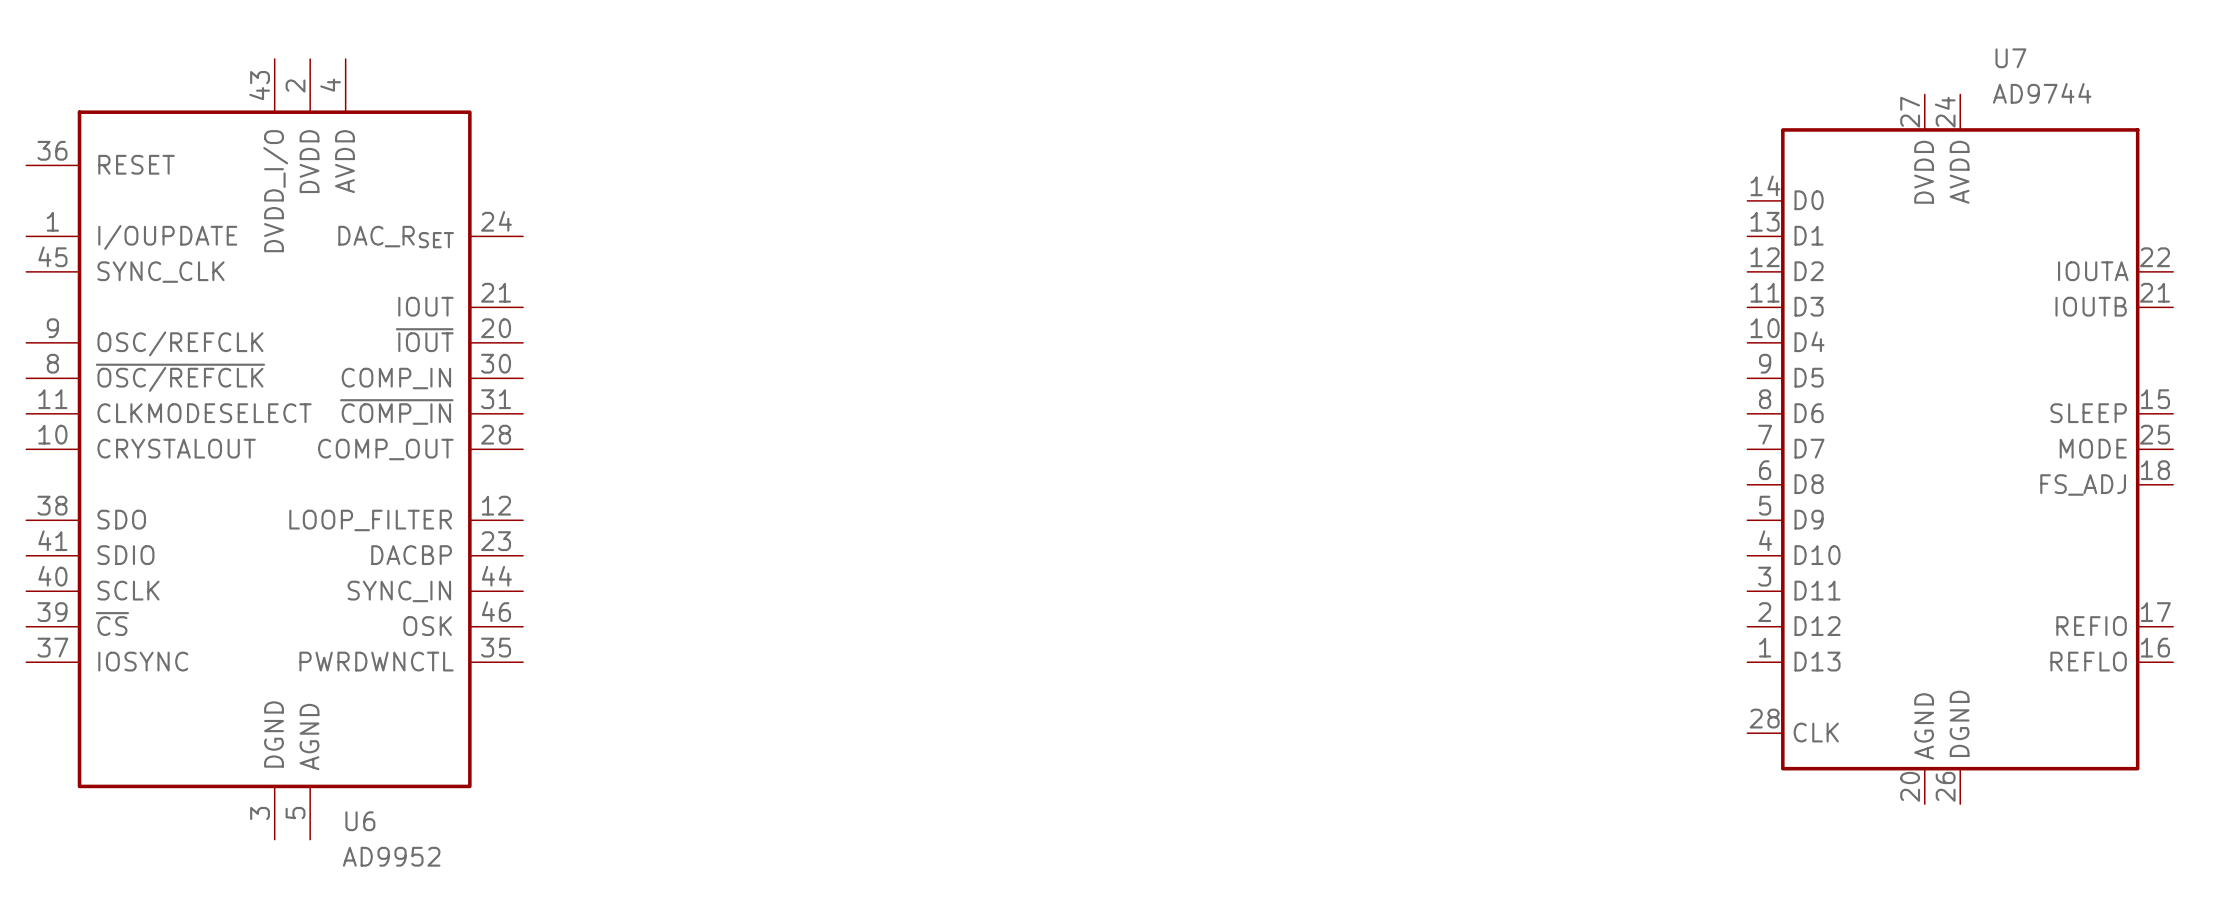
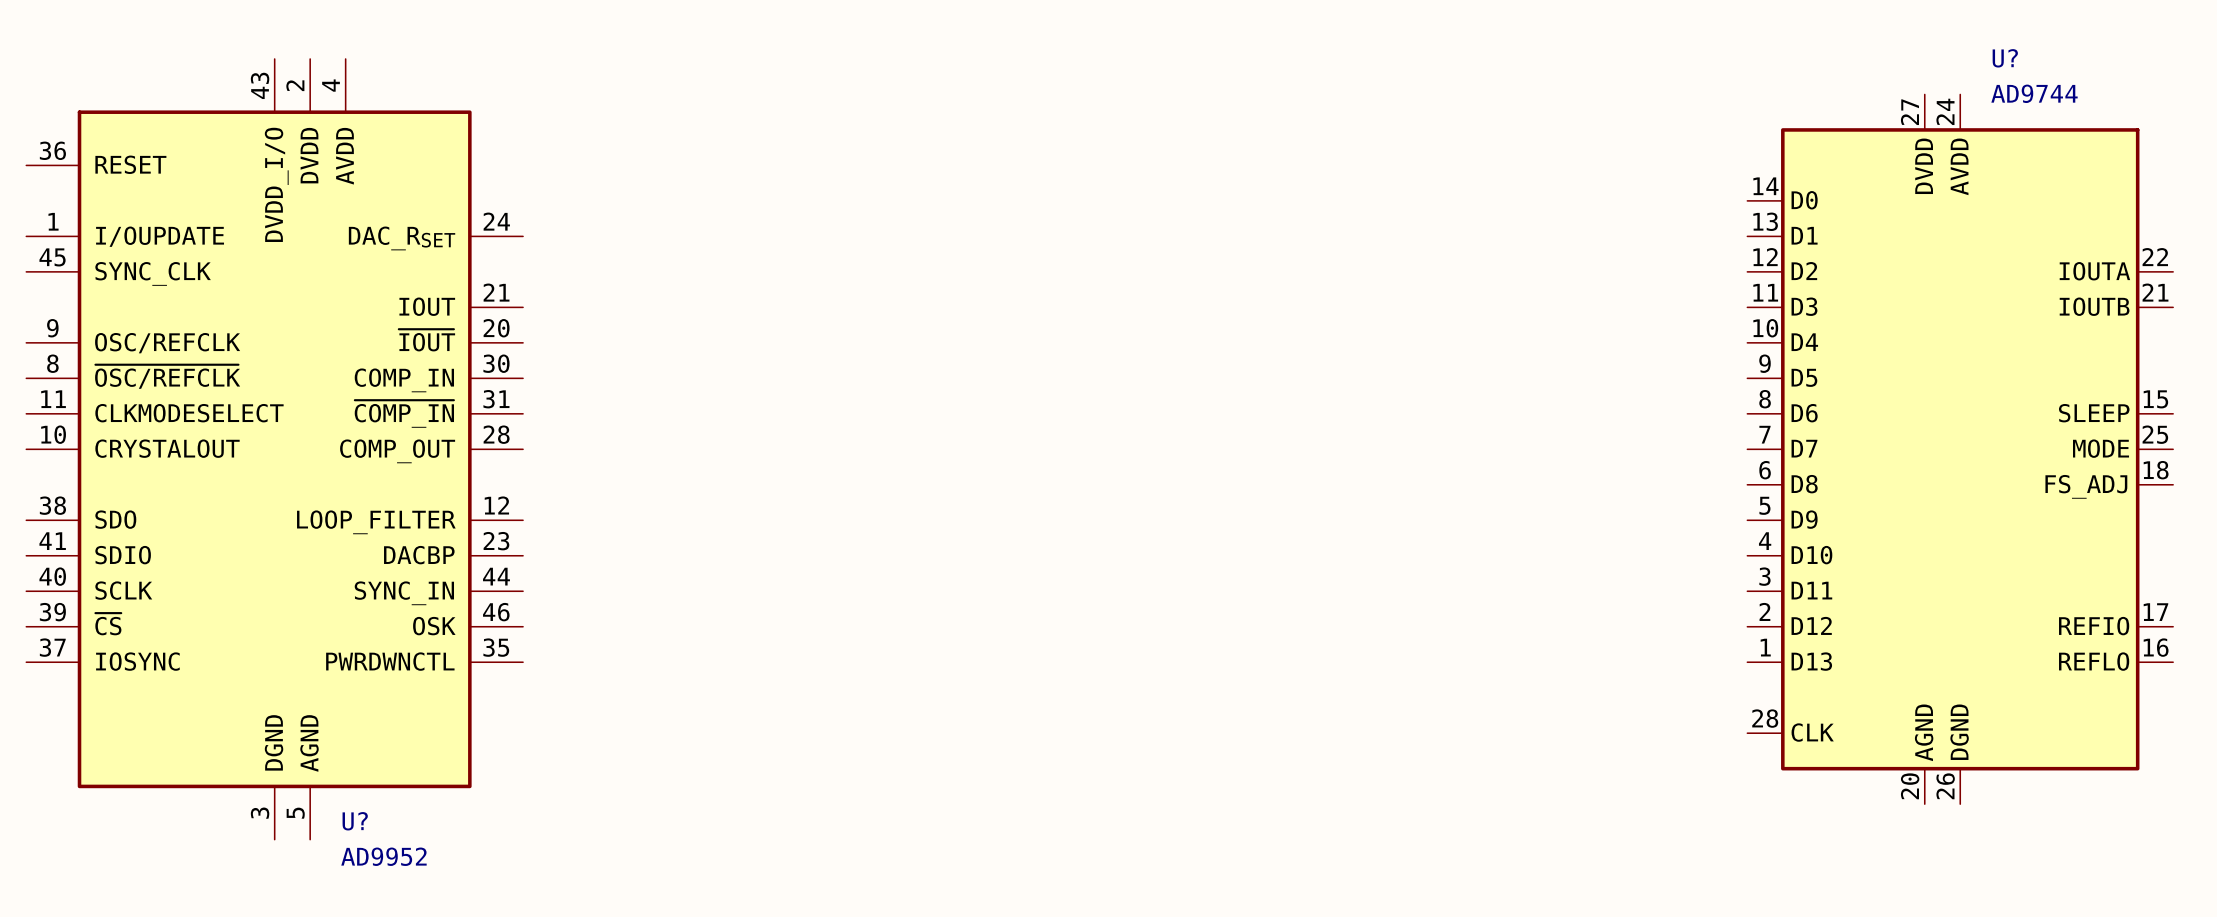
U7 name: U7 (2010, 58) -> U? (2005, 58)
U6 name: U6 (360, 821) -> U? (355, 821)

